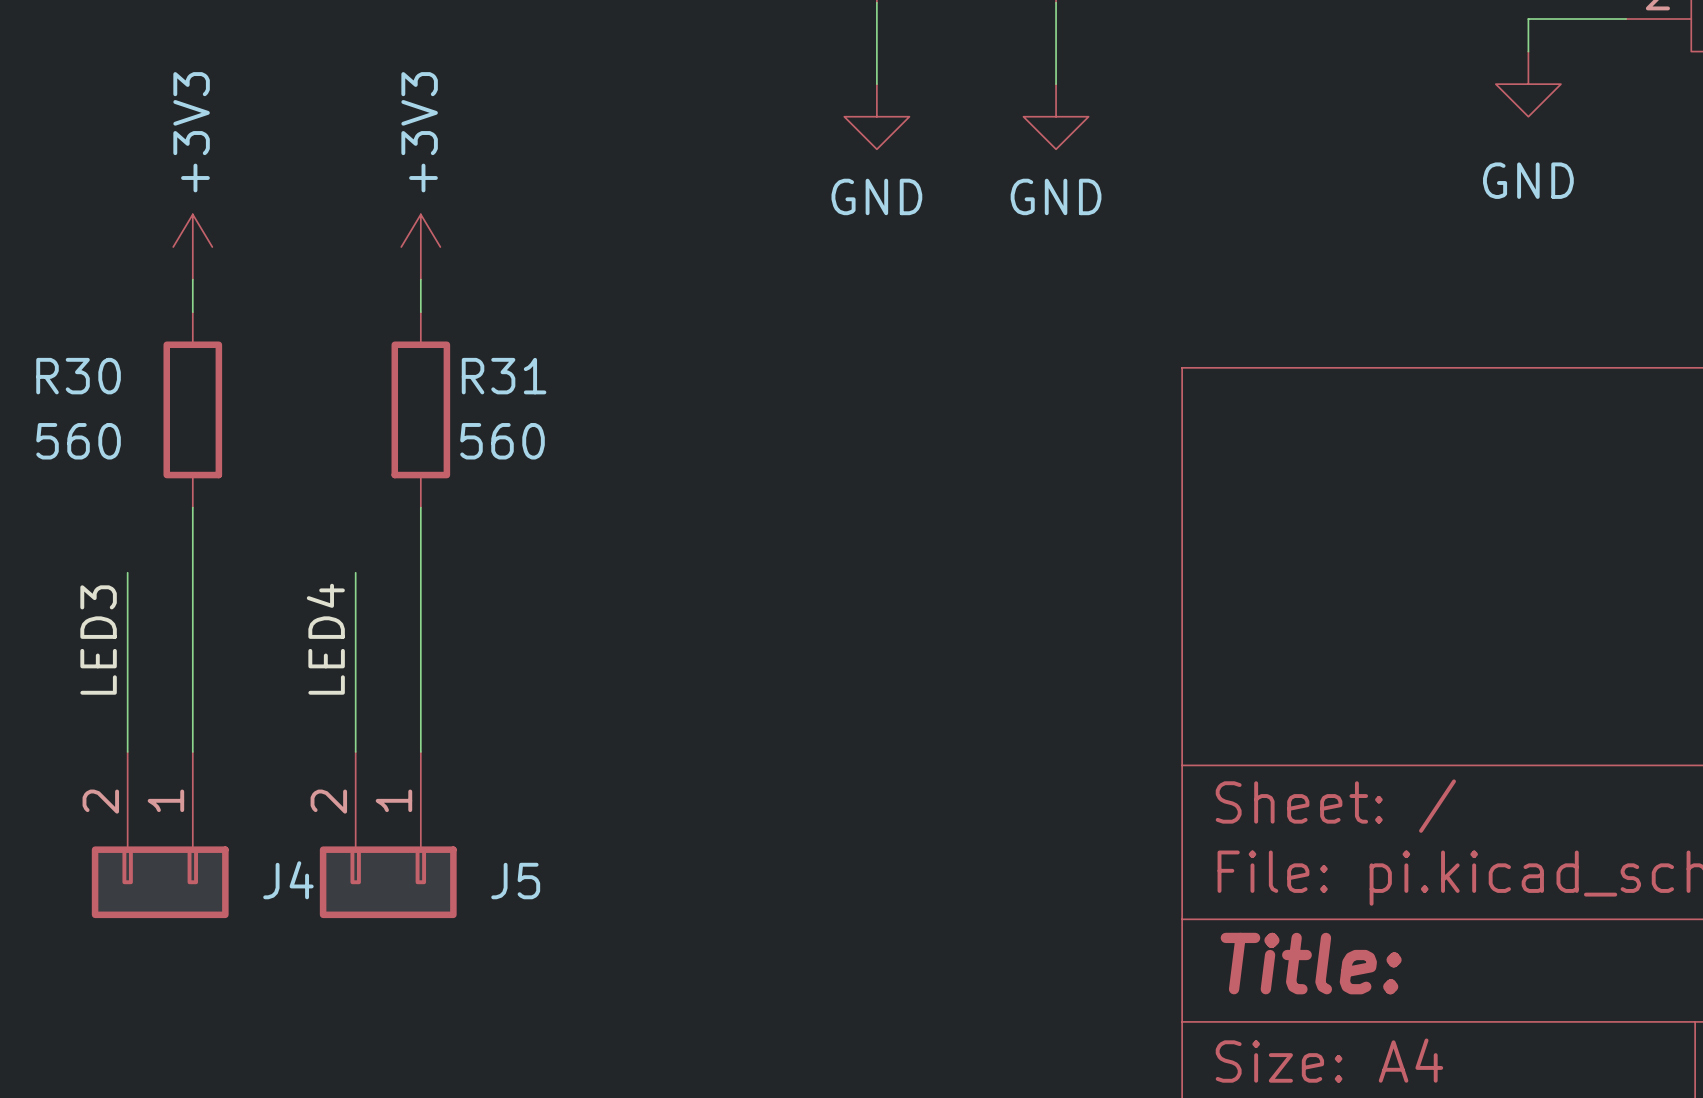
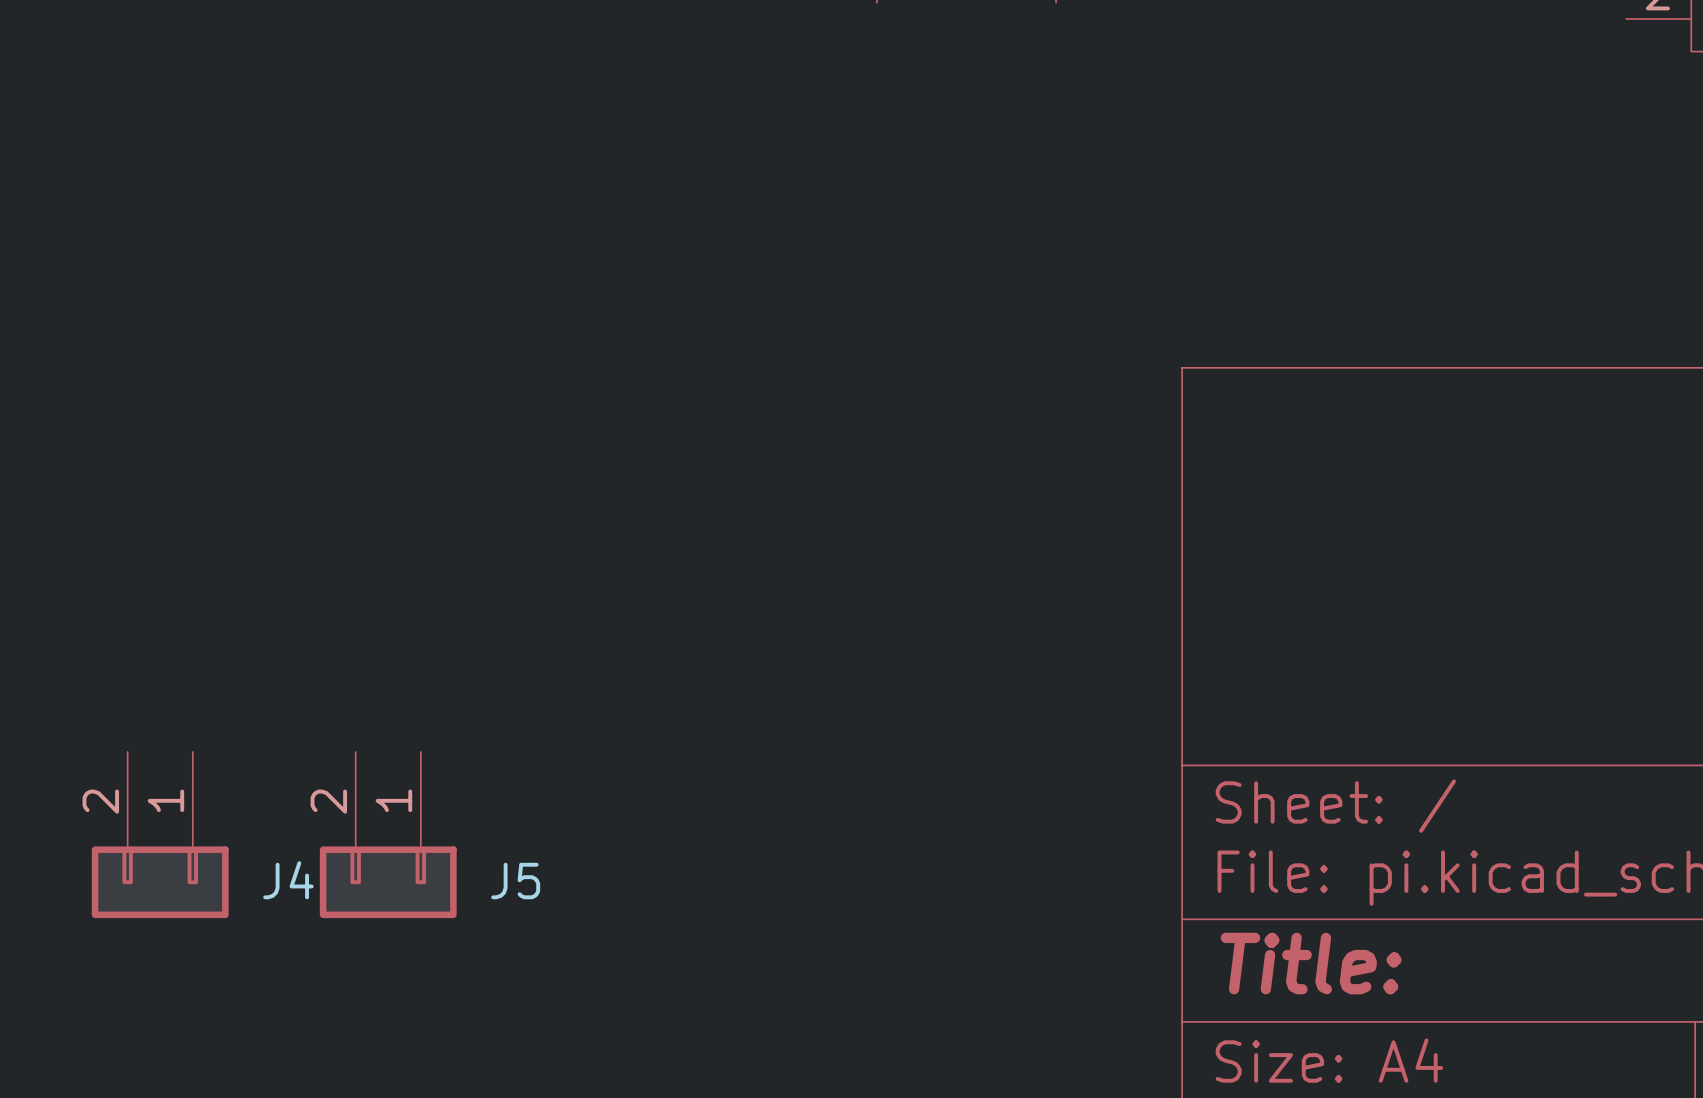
wire: (876, 2) (876, 84) -> none
wire: (1056, 2) (1056, 84) -> none
wire: (1626, 19) (1528, 19) (1528, 51) -> none
power symbol: GND (1528, 84) -> none
power symbol: GND (876, 116) -> none
power symbol: GND (1056, 116) -> none
power symbol: +3V3 (192, 247) -> none
power symbol: +3V3 (420, 247) -> none
wire: (192, 279) (192, 312) -> none
wire: (420, 279) (420, 312) -> none
R30: 560 (192, 409) -> none
R31: 560 (420, 409) -> none
wire: (192, 507) (192, 751) -> none
wire: (420, 507) (420, 751) -> none
wire: (127, 572) (127, 751) -> none
wire: (355, 572) (355, 751) -> none
label: LED4 (325, 639) -> none
label: LED3 (98, 640) -> none

